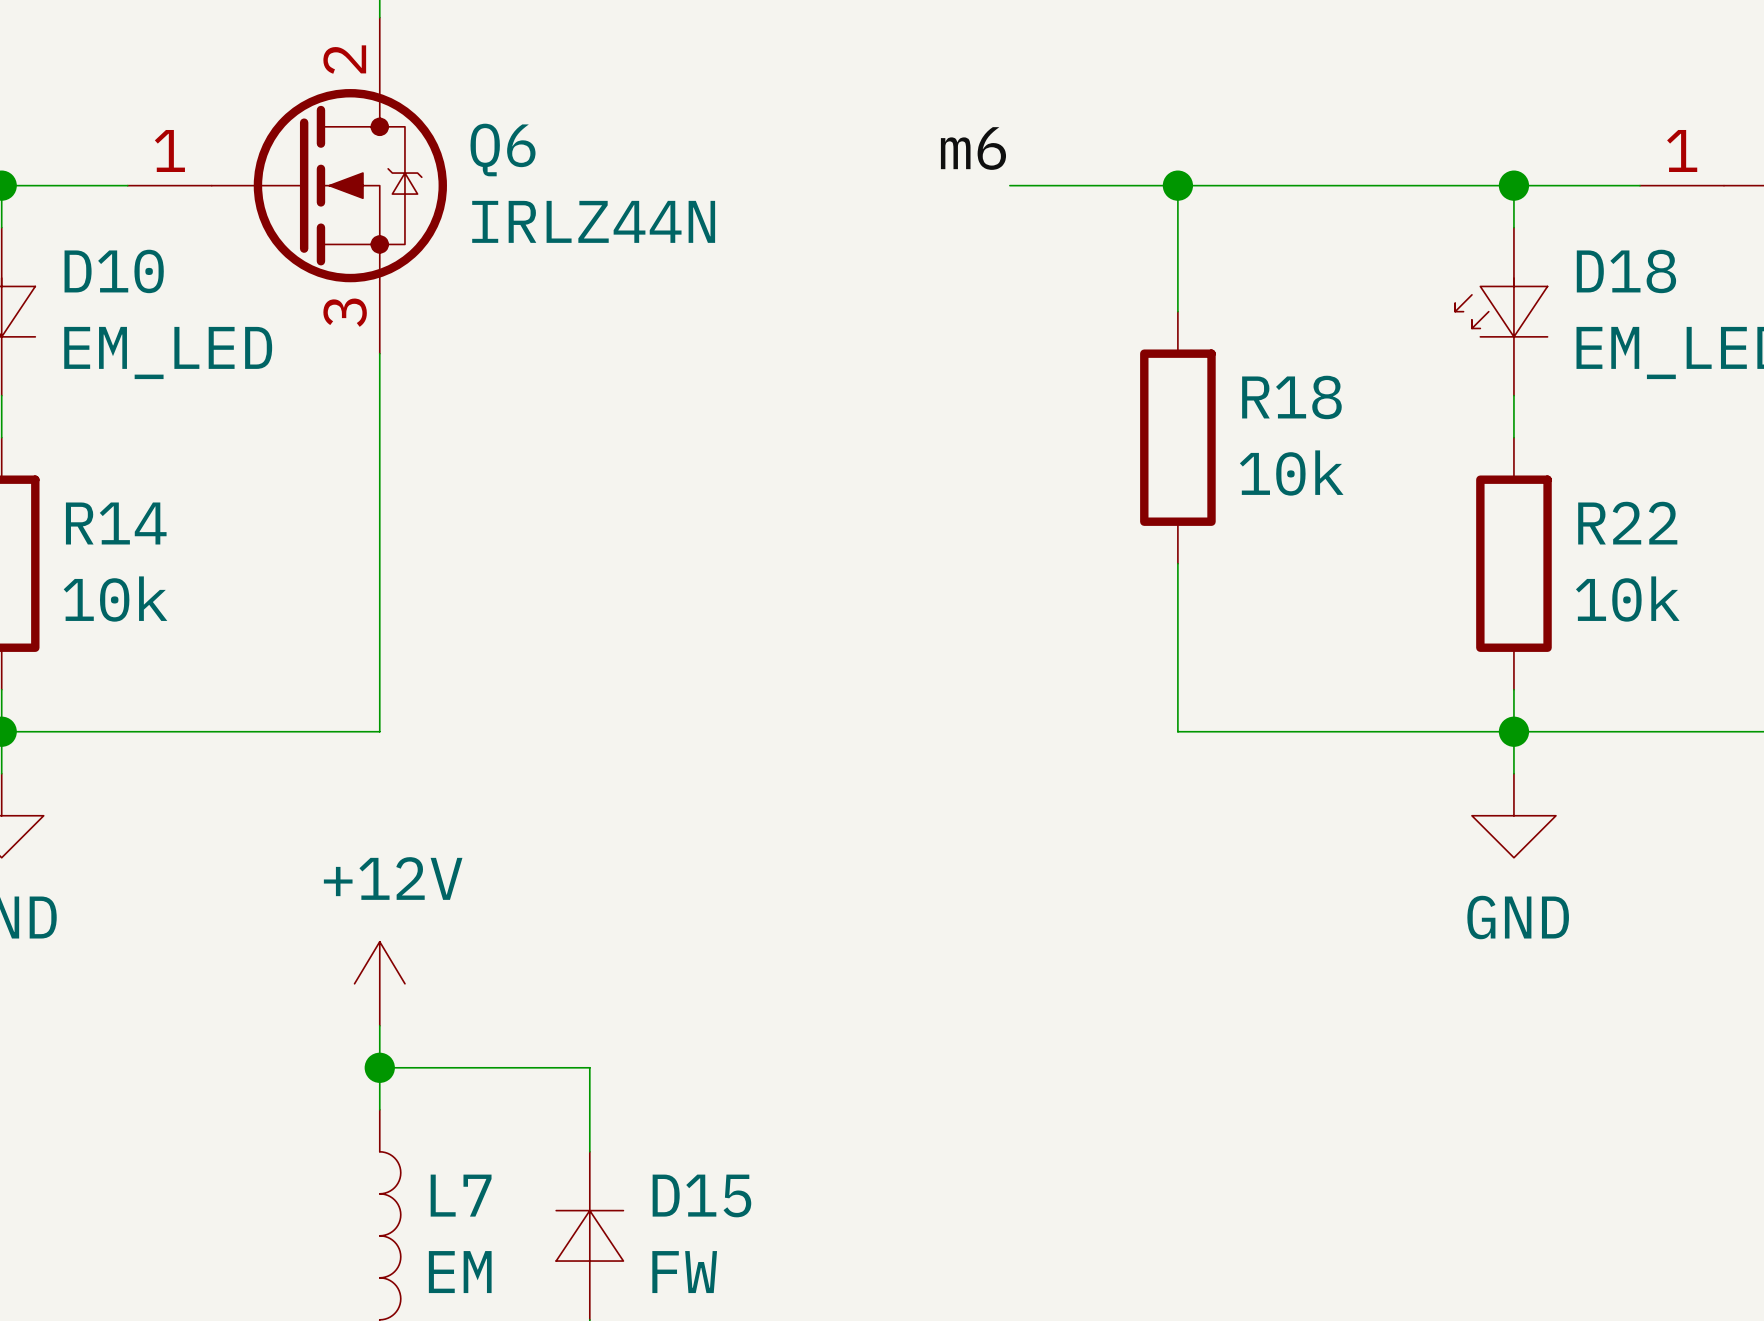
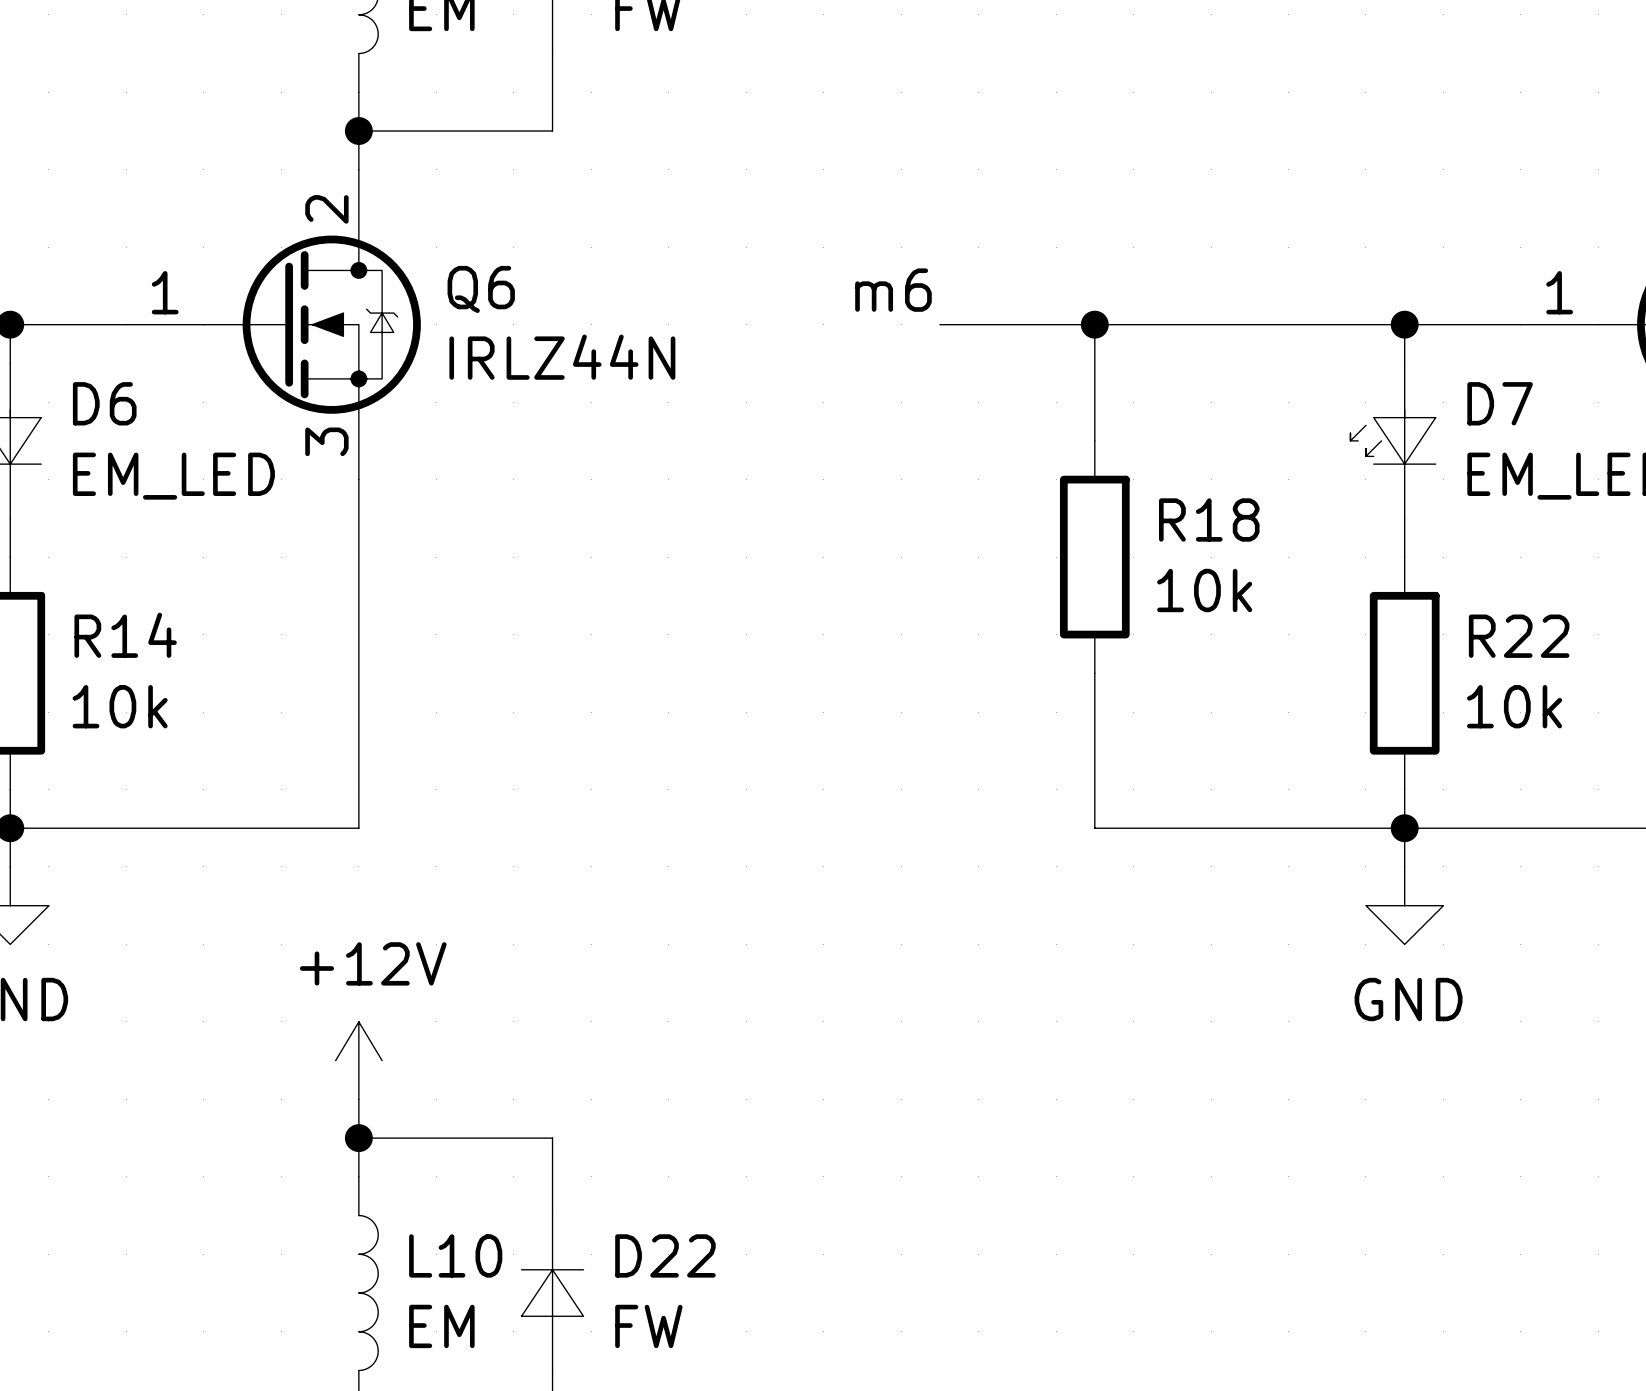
D10 name: D10 (114, 271) -> D6 (104, 403)
D18 name: D18 (1626, 271) -> D7 (1500, 403)
L7 name: L7 (461, 1195) -> L10 (455, 1255)
D15 name: D15 (701, 1195) -> D22 (665, 1255)

